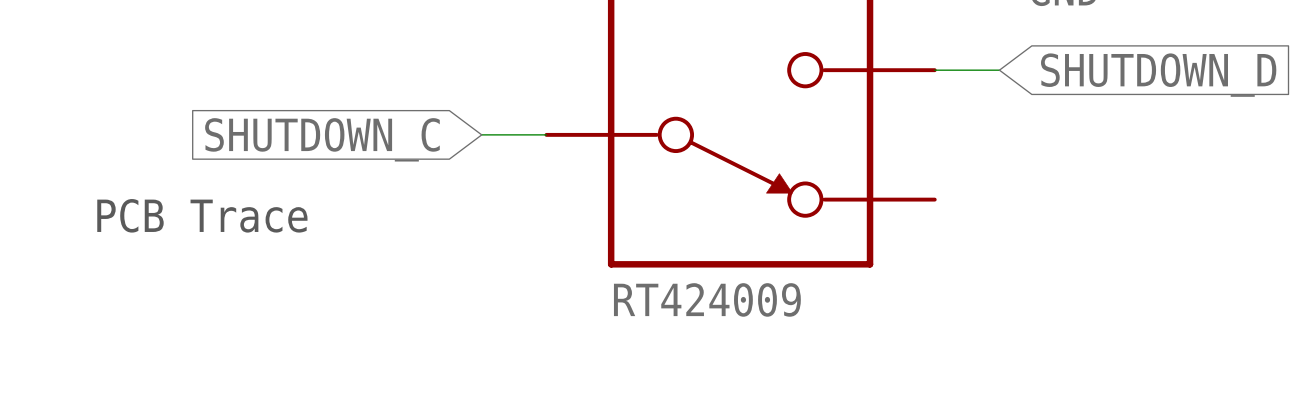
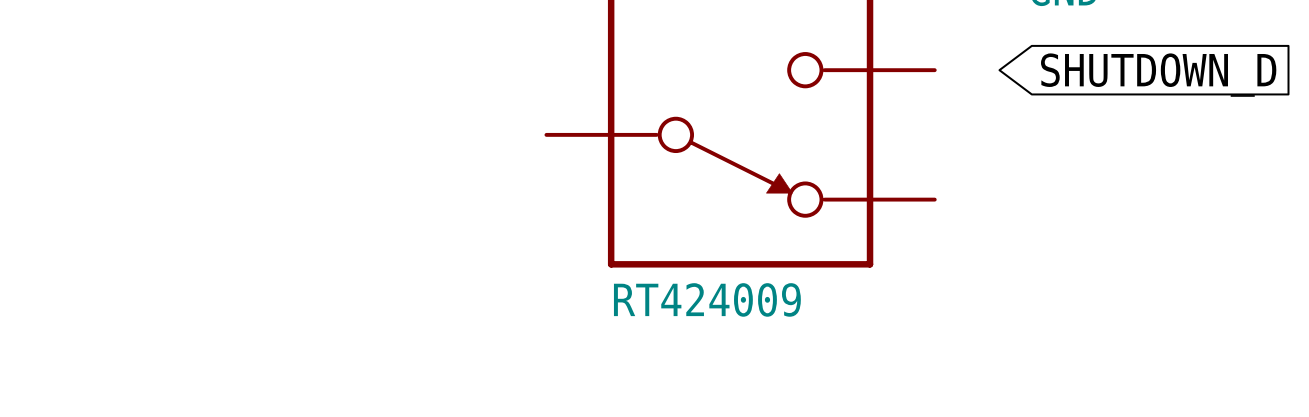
wire: (934, 70) (999, 70) -> none
wire: (481, 134) (546, 134) -> none
global label: SHUTDOWN_C (322, 139) -> none
text: PCB Trace (202, 215) -> none

